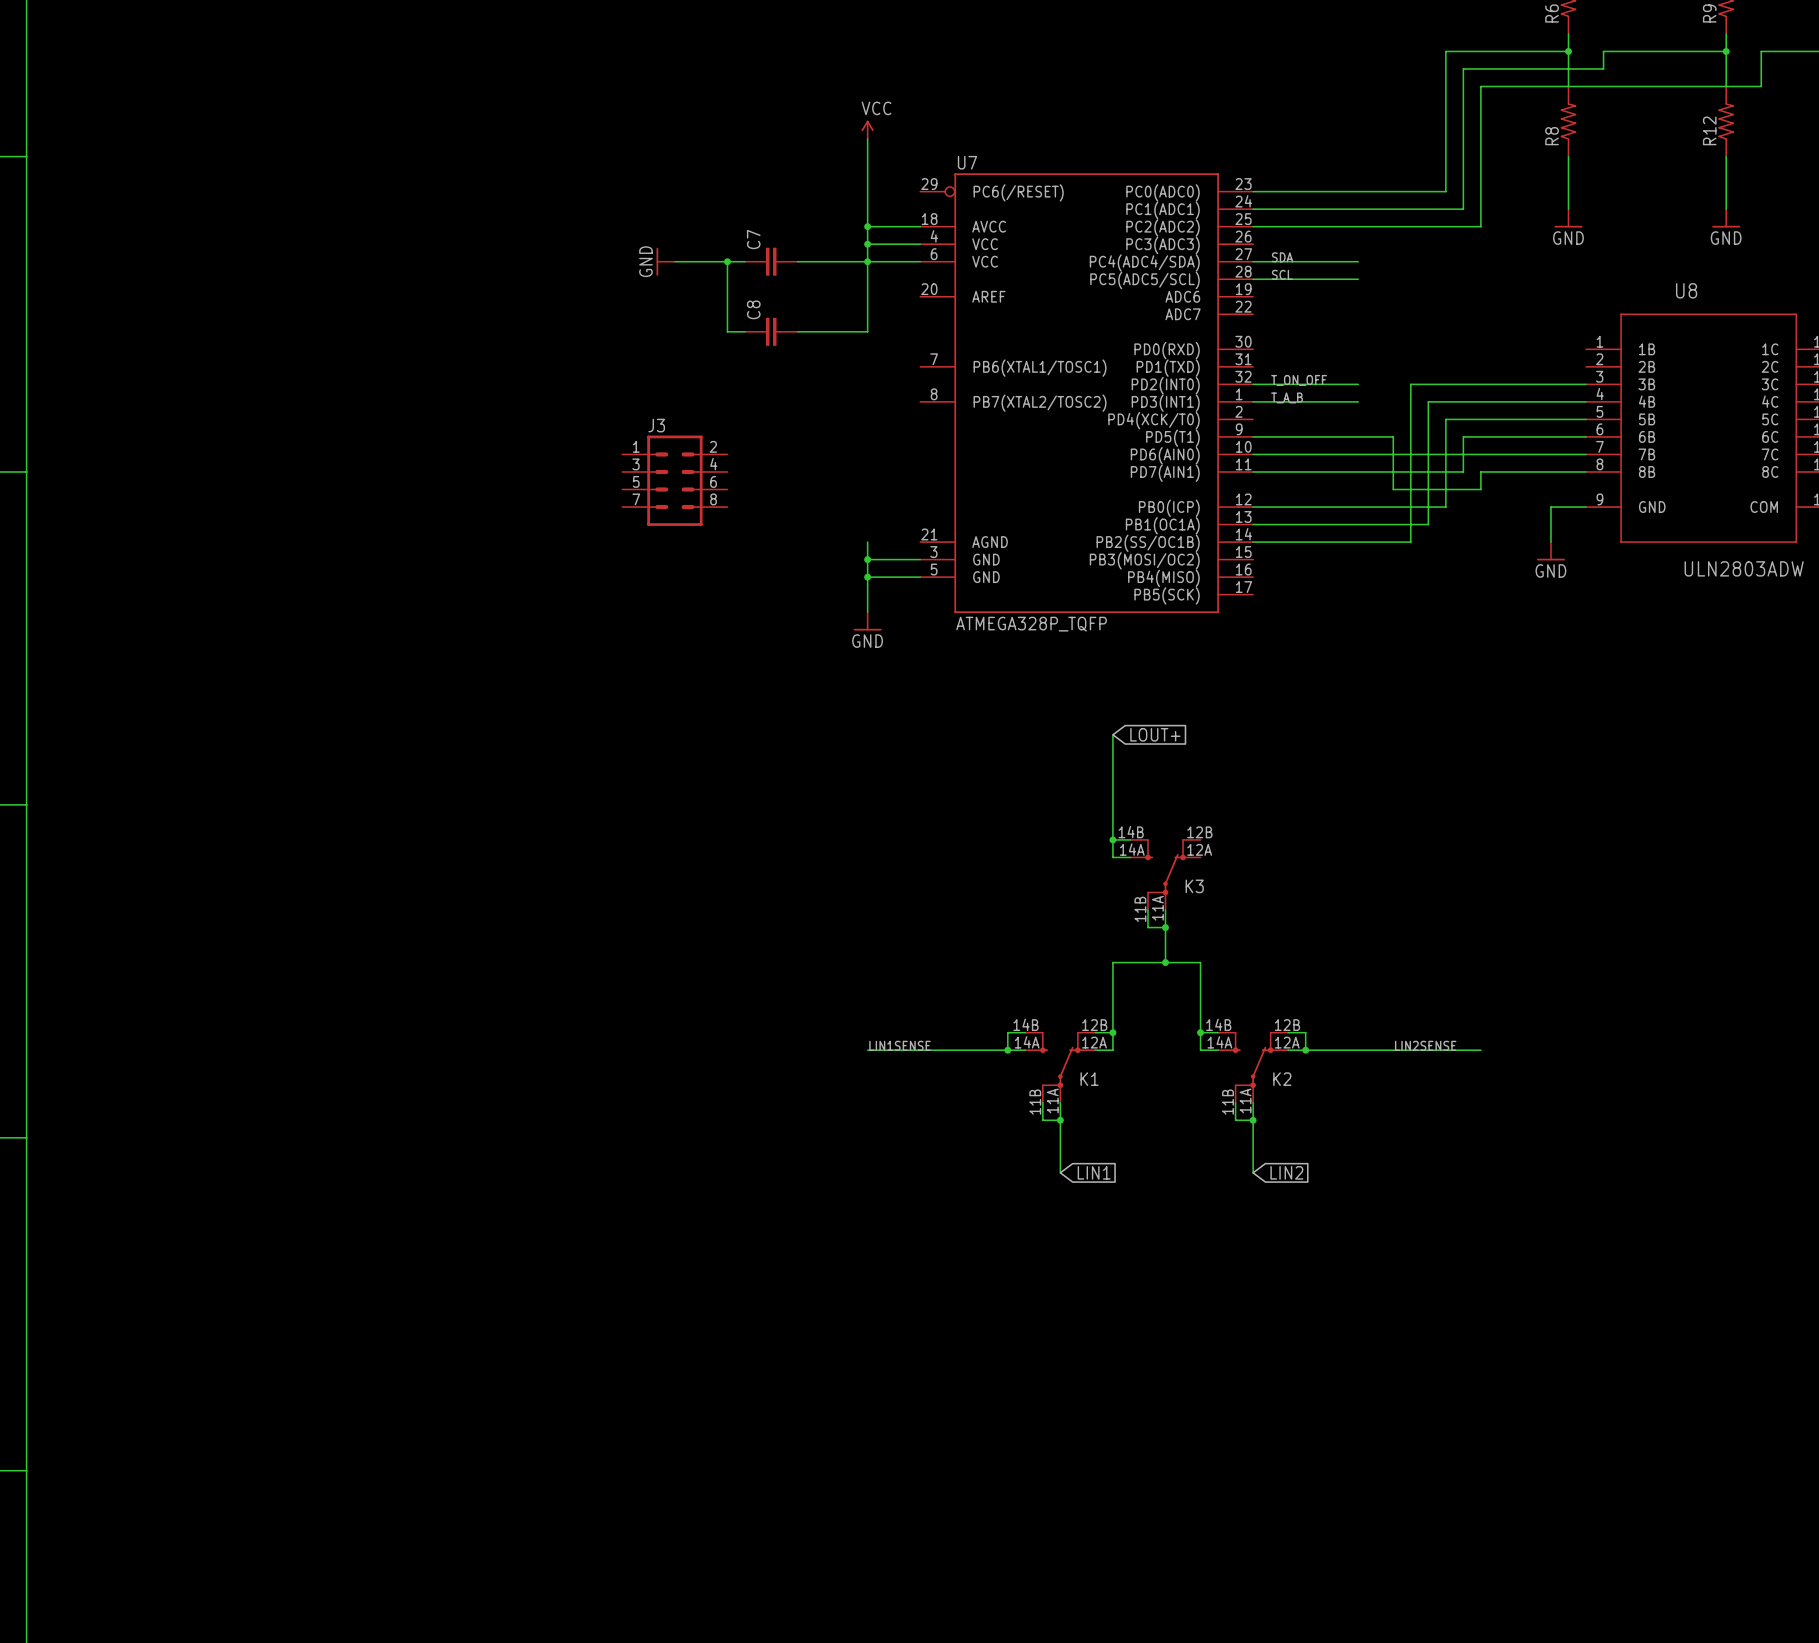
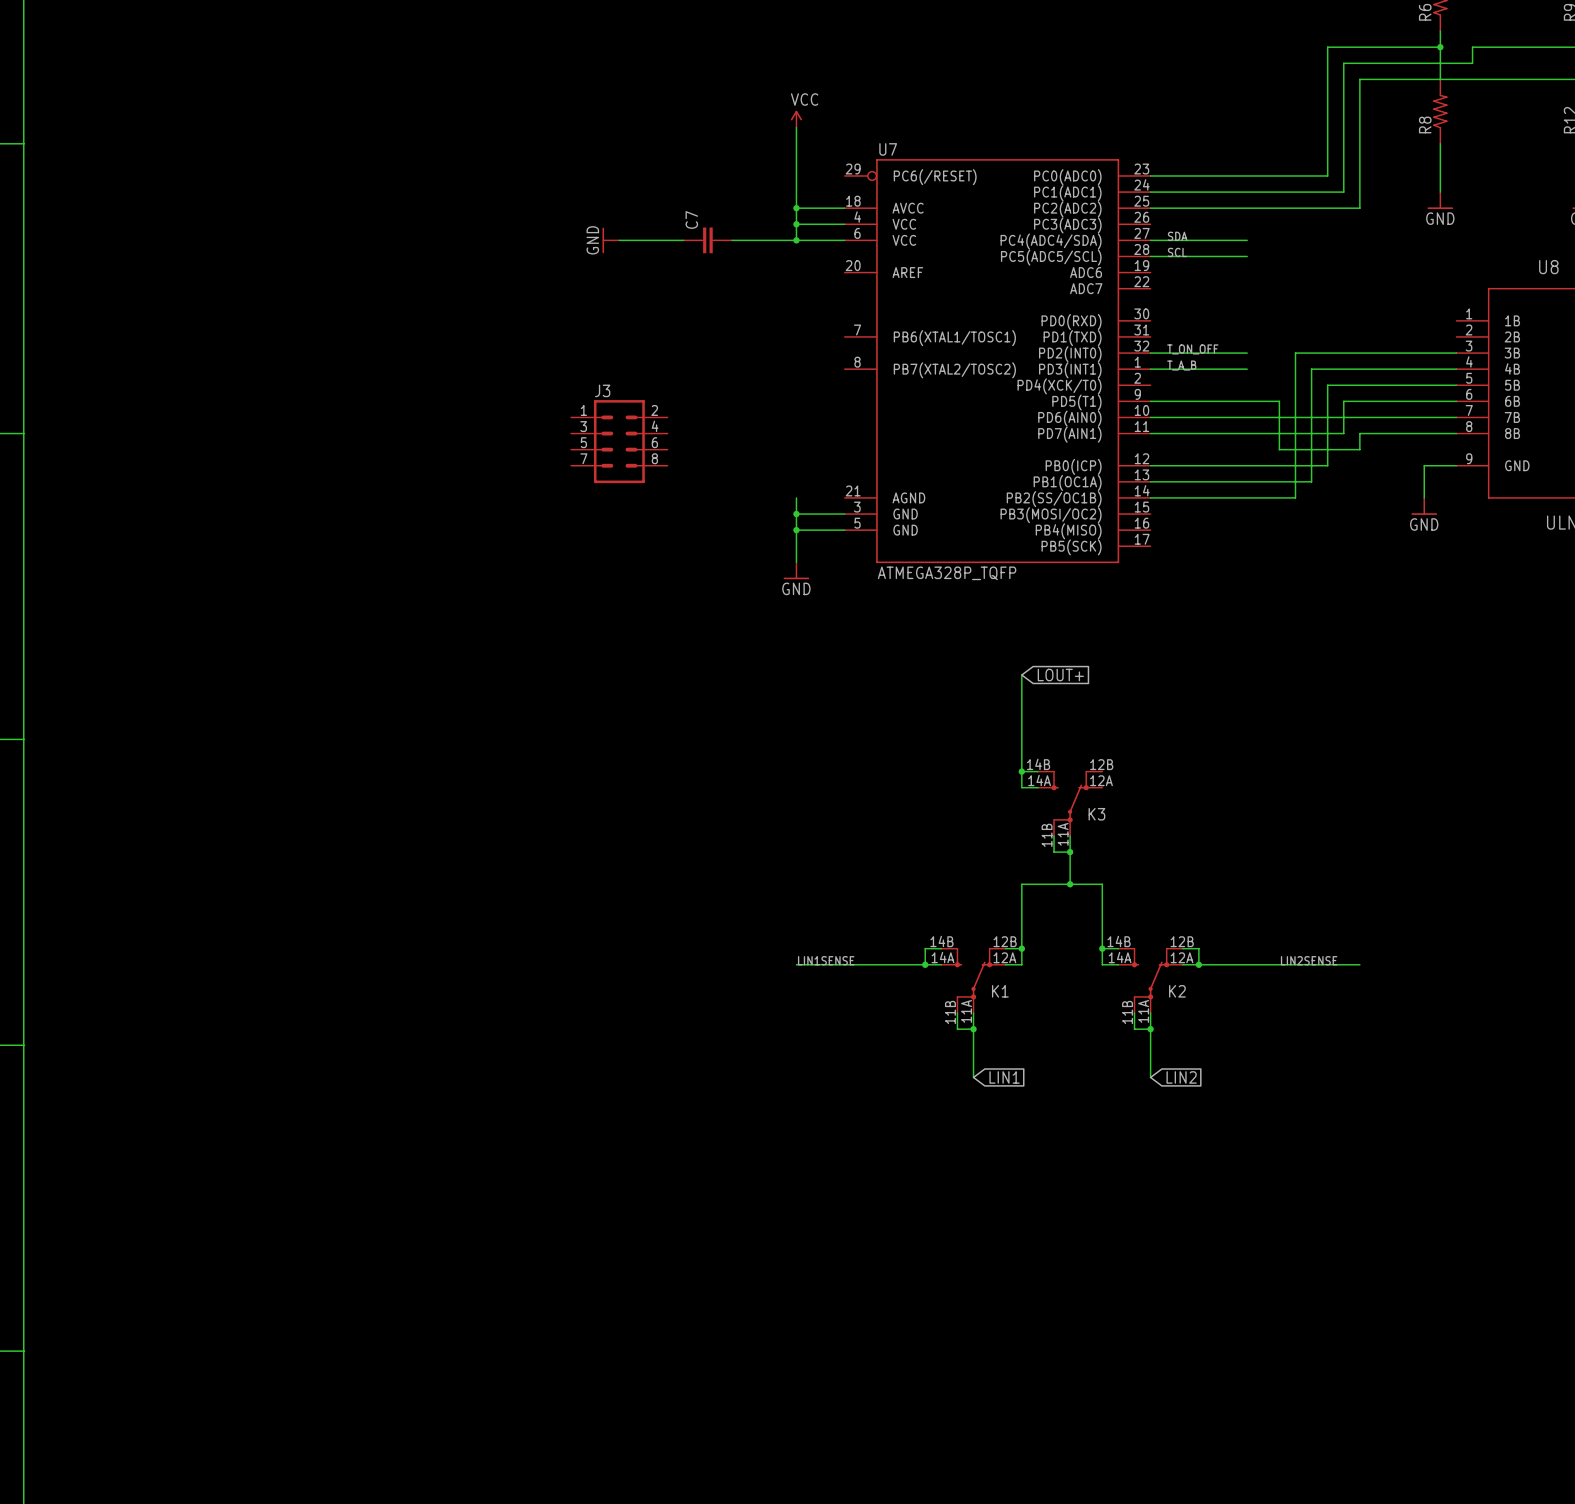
wire: (727, 261) (727, 331) (744, 331) -> none
junction: (727, 261) -> none
wire: (867, 261) (867, 331) (797, 331) -> none
C8: (771, 331) -> none

